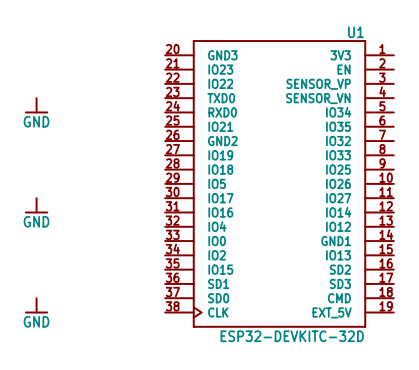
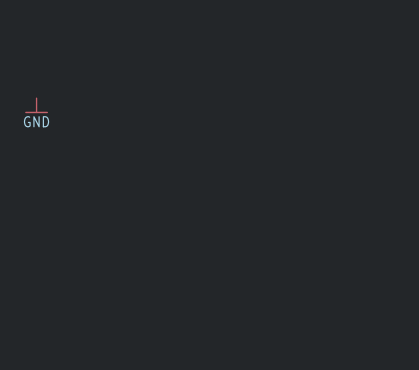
U1: ESP32-DEVKITC-32D (279, 183) -> none
power symbol: GND (36, 205) -> none
power symbol: GND (36, 305) -> none

